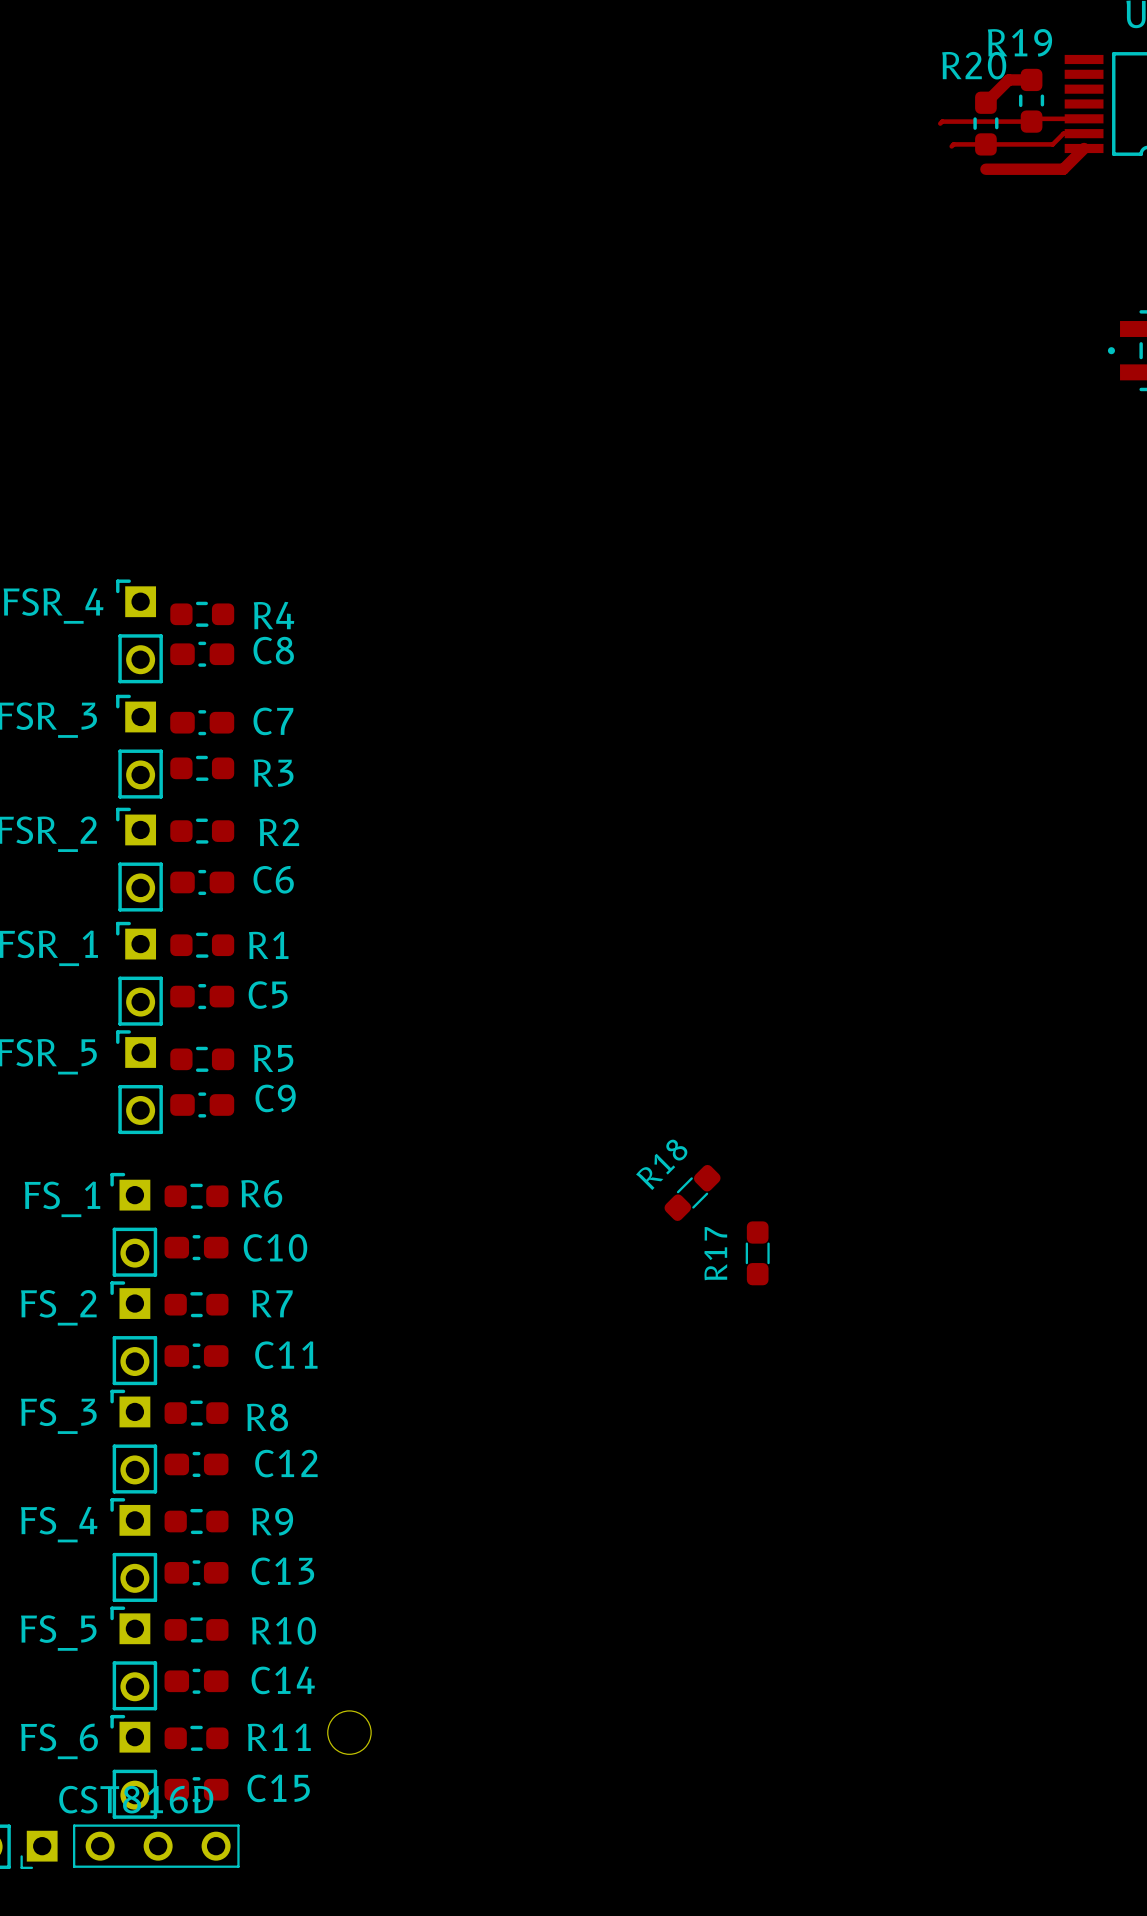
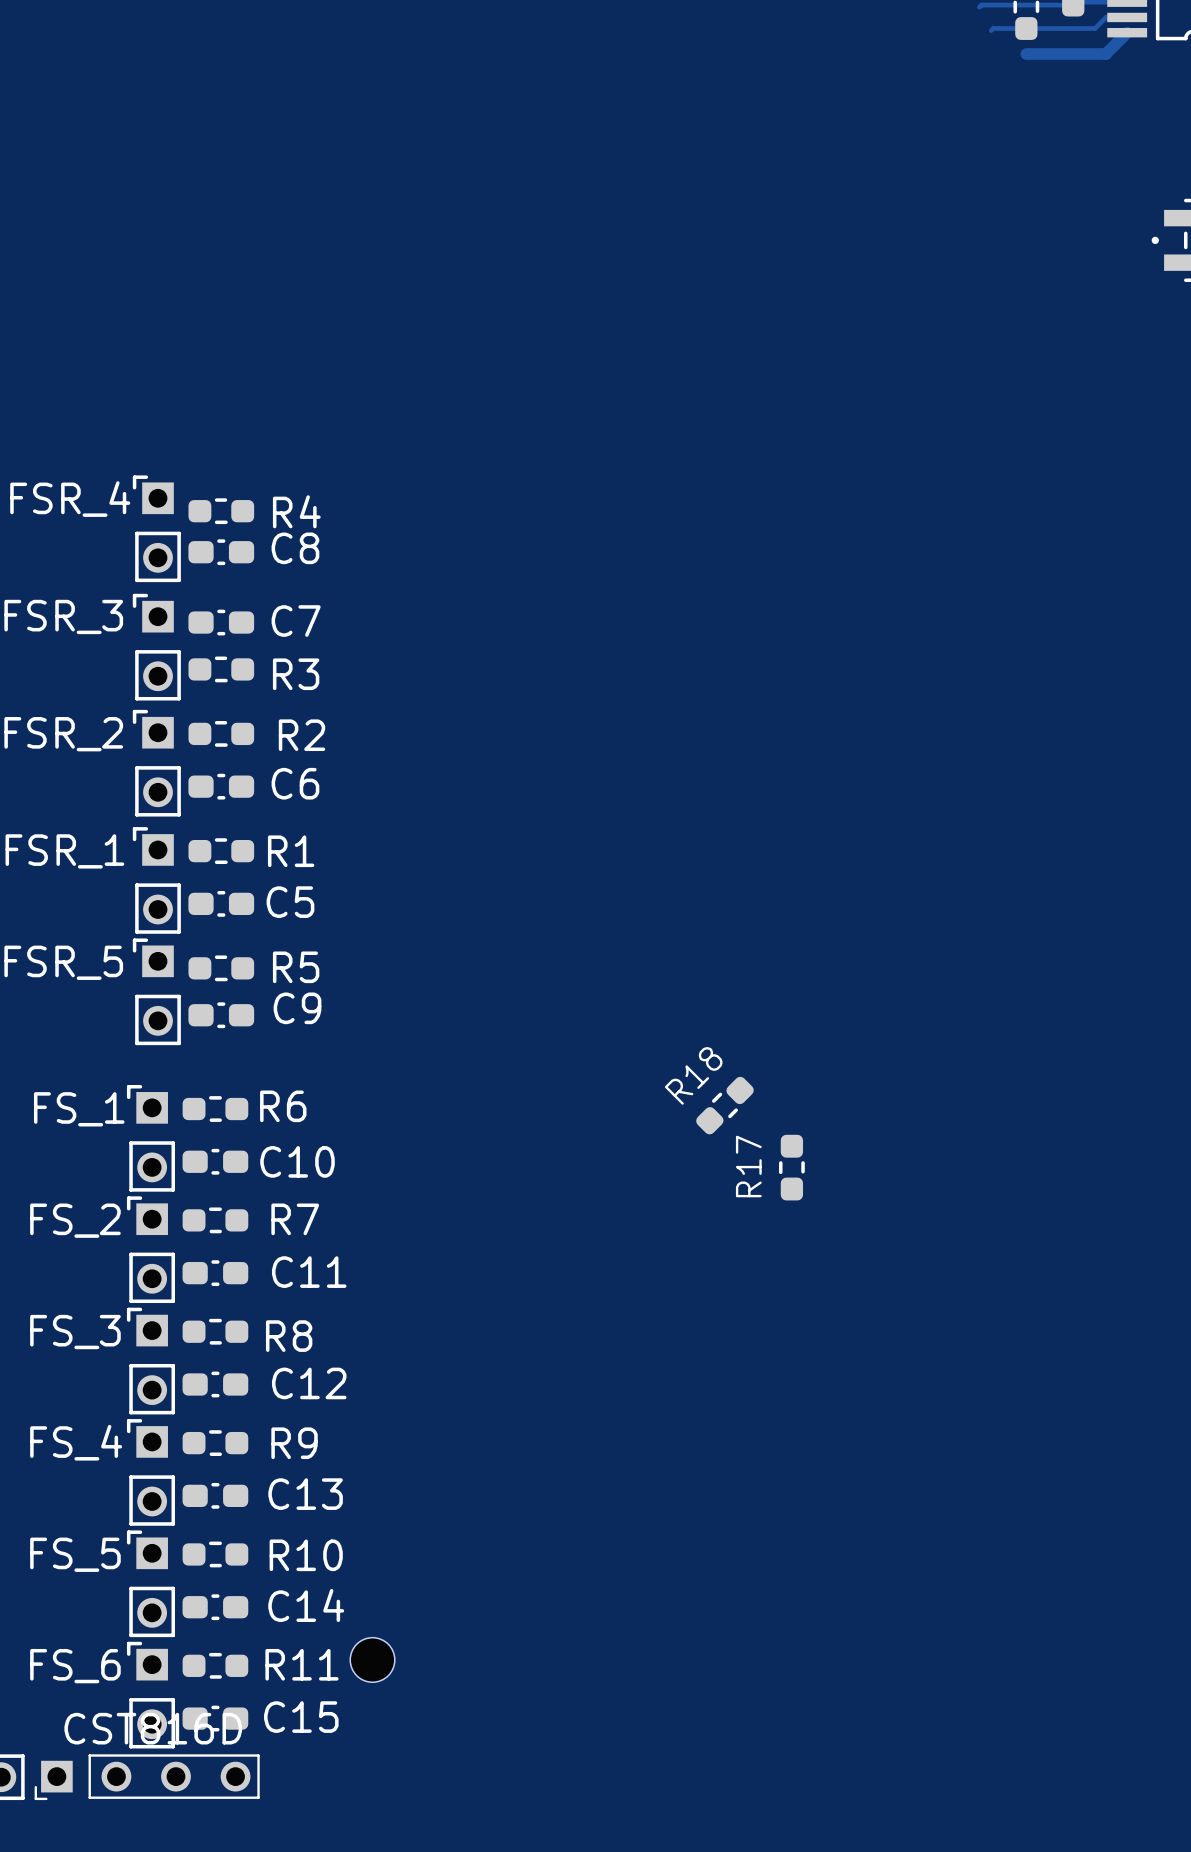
R18 footprint: [664, 1164, 721, 1221] -> [696, 1076, 754, 1135]
R17 footprint: [745, 1221, 770, 1286] -> [779, 1134, 805, 1201]

